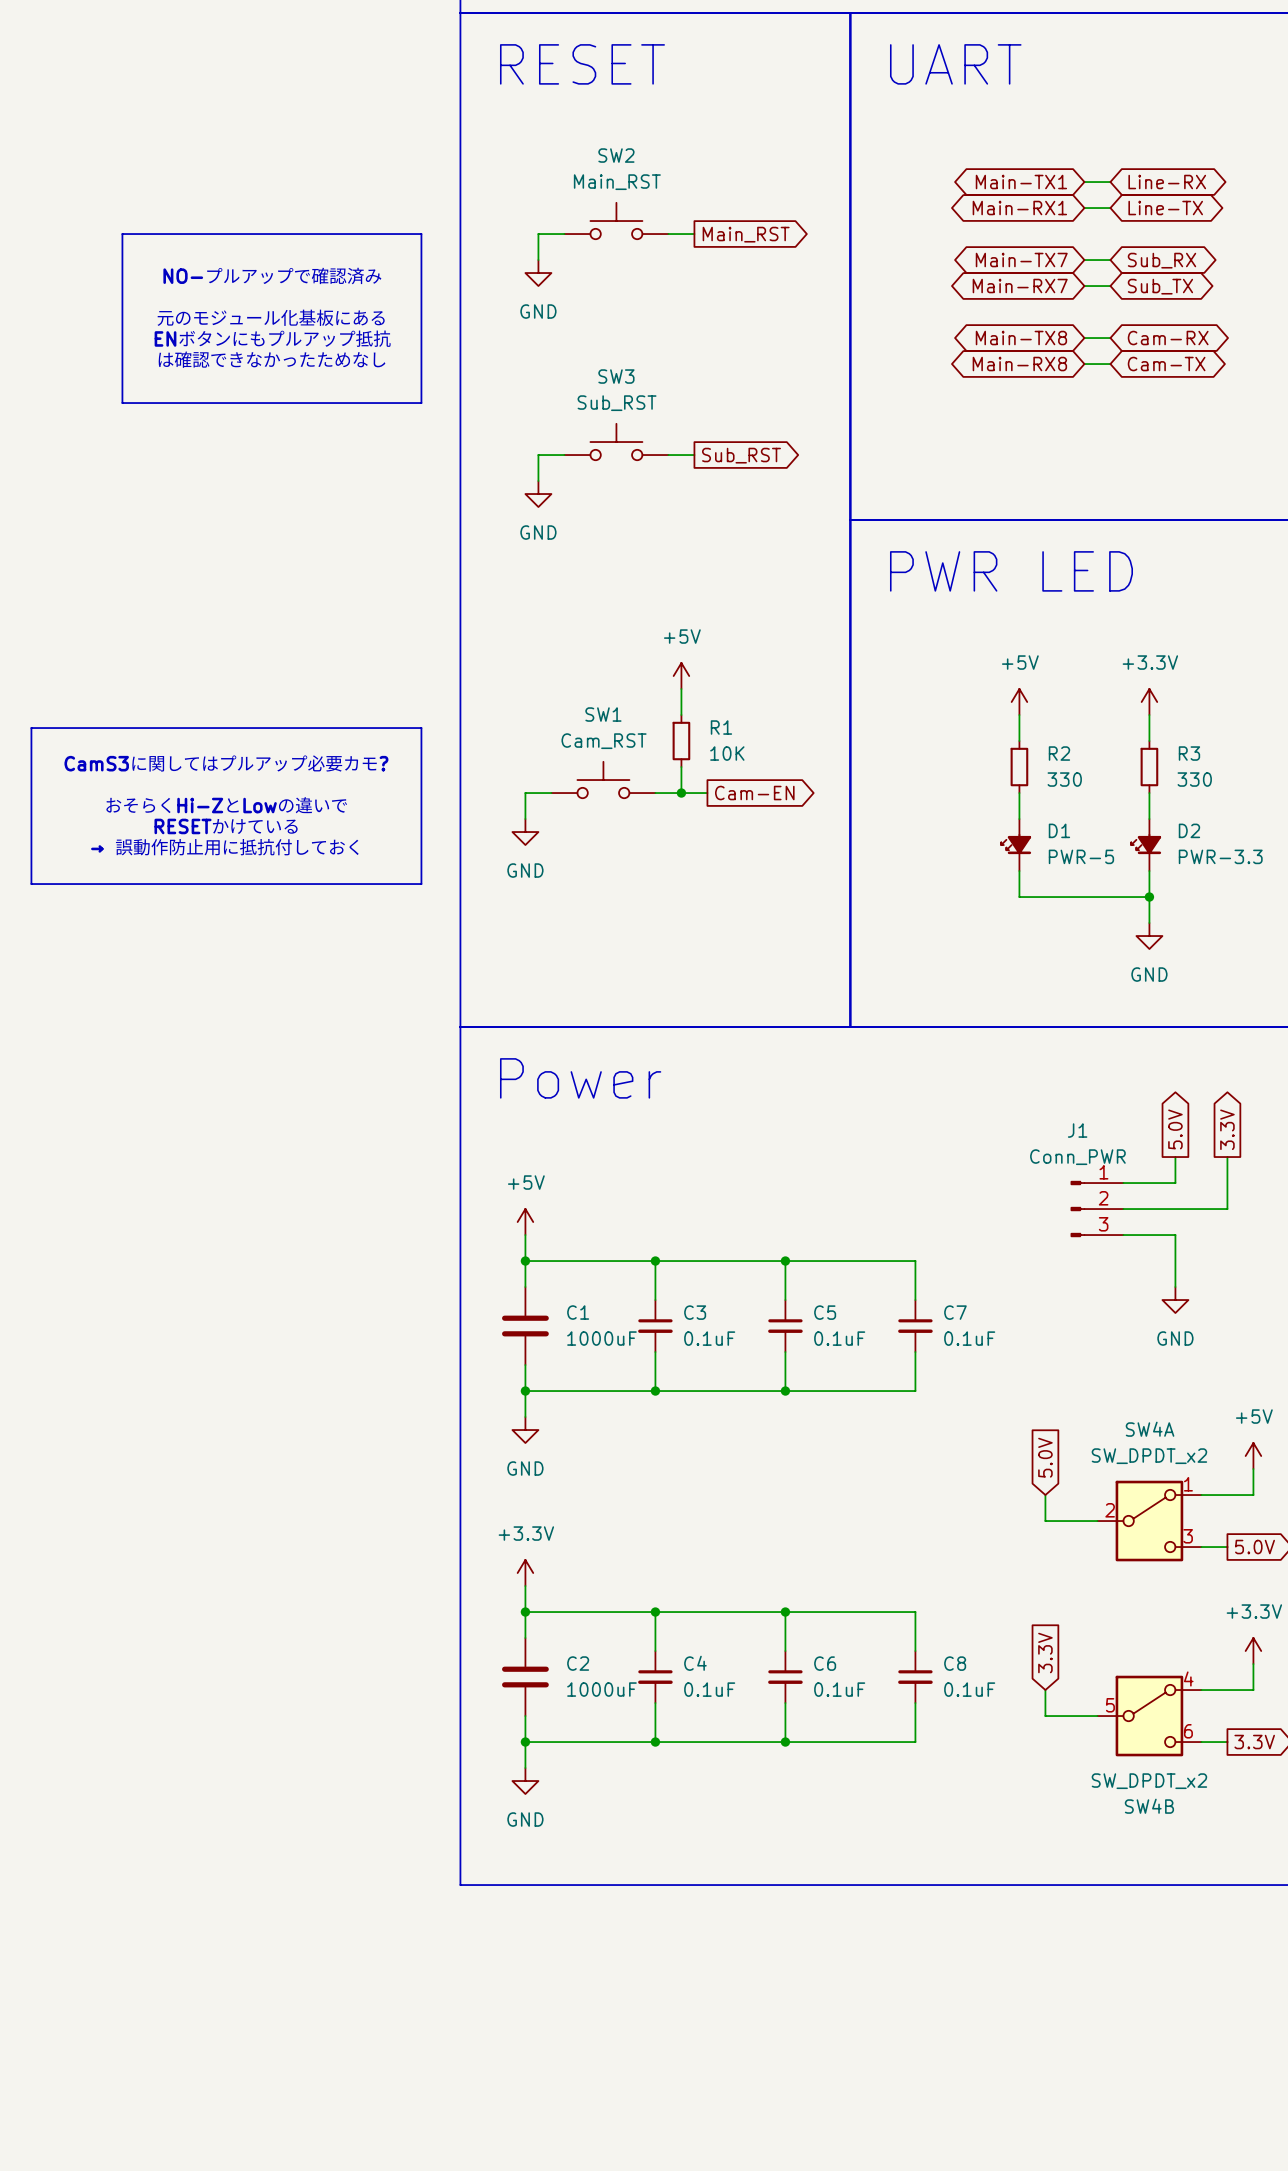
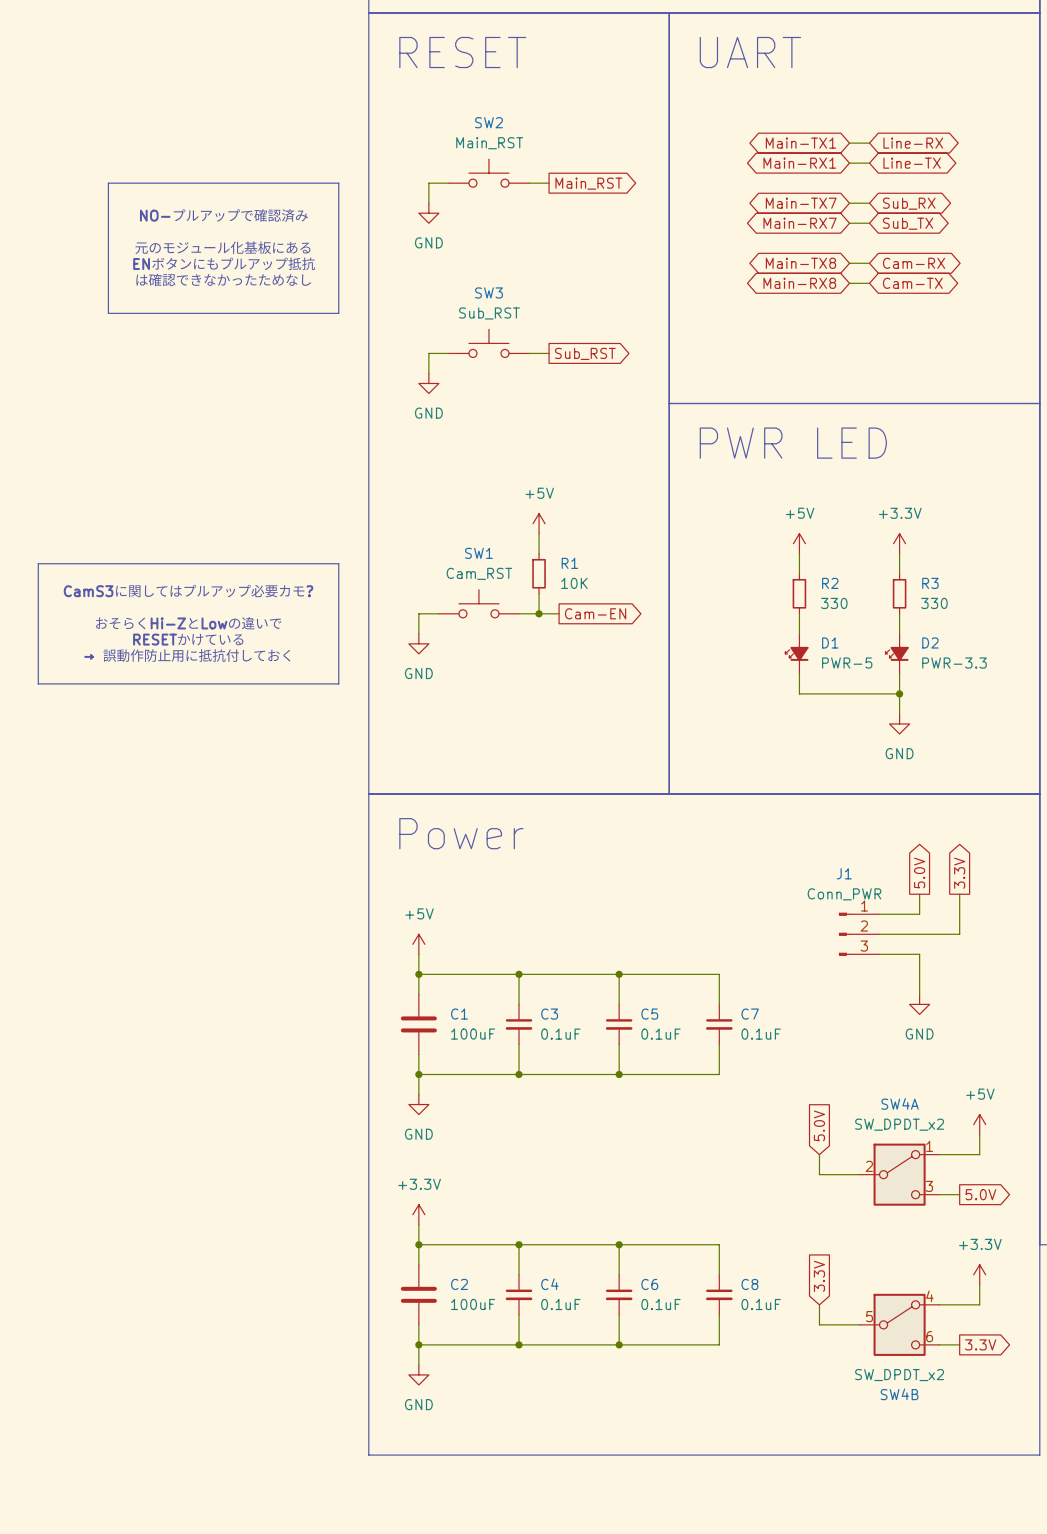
C1 value: 1000uF (601, 1338) -> 100uF (473, 1034)
C2 value: 1000uF (601, 1689) -> 100uF (473, 1304)

